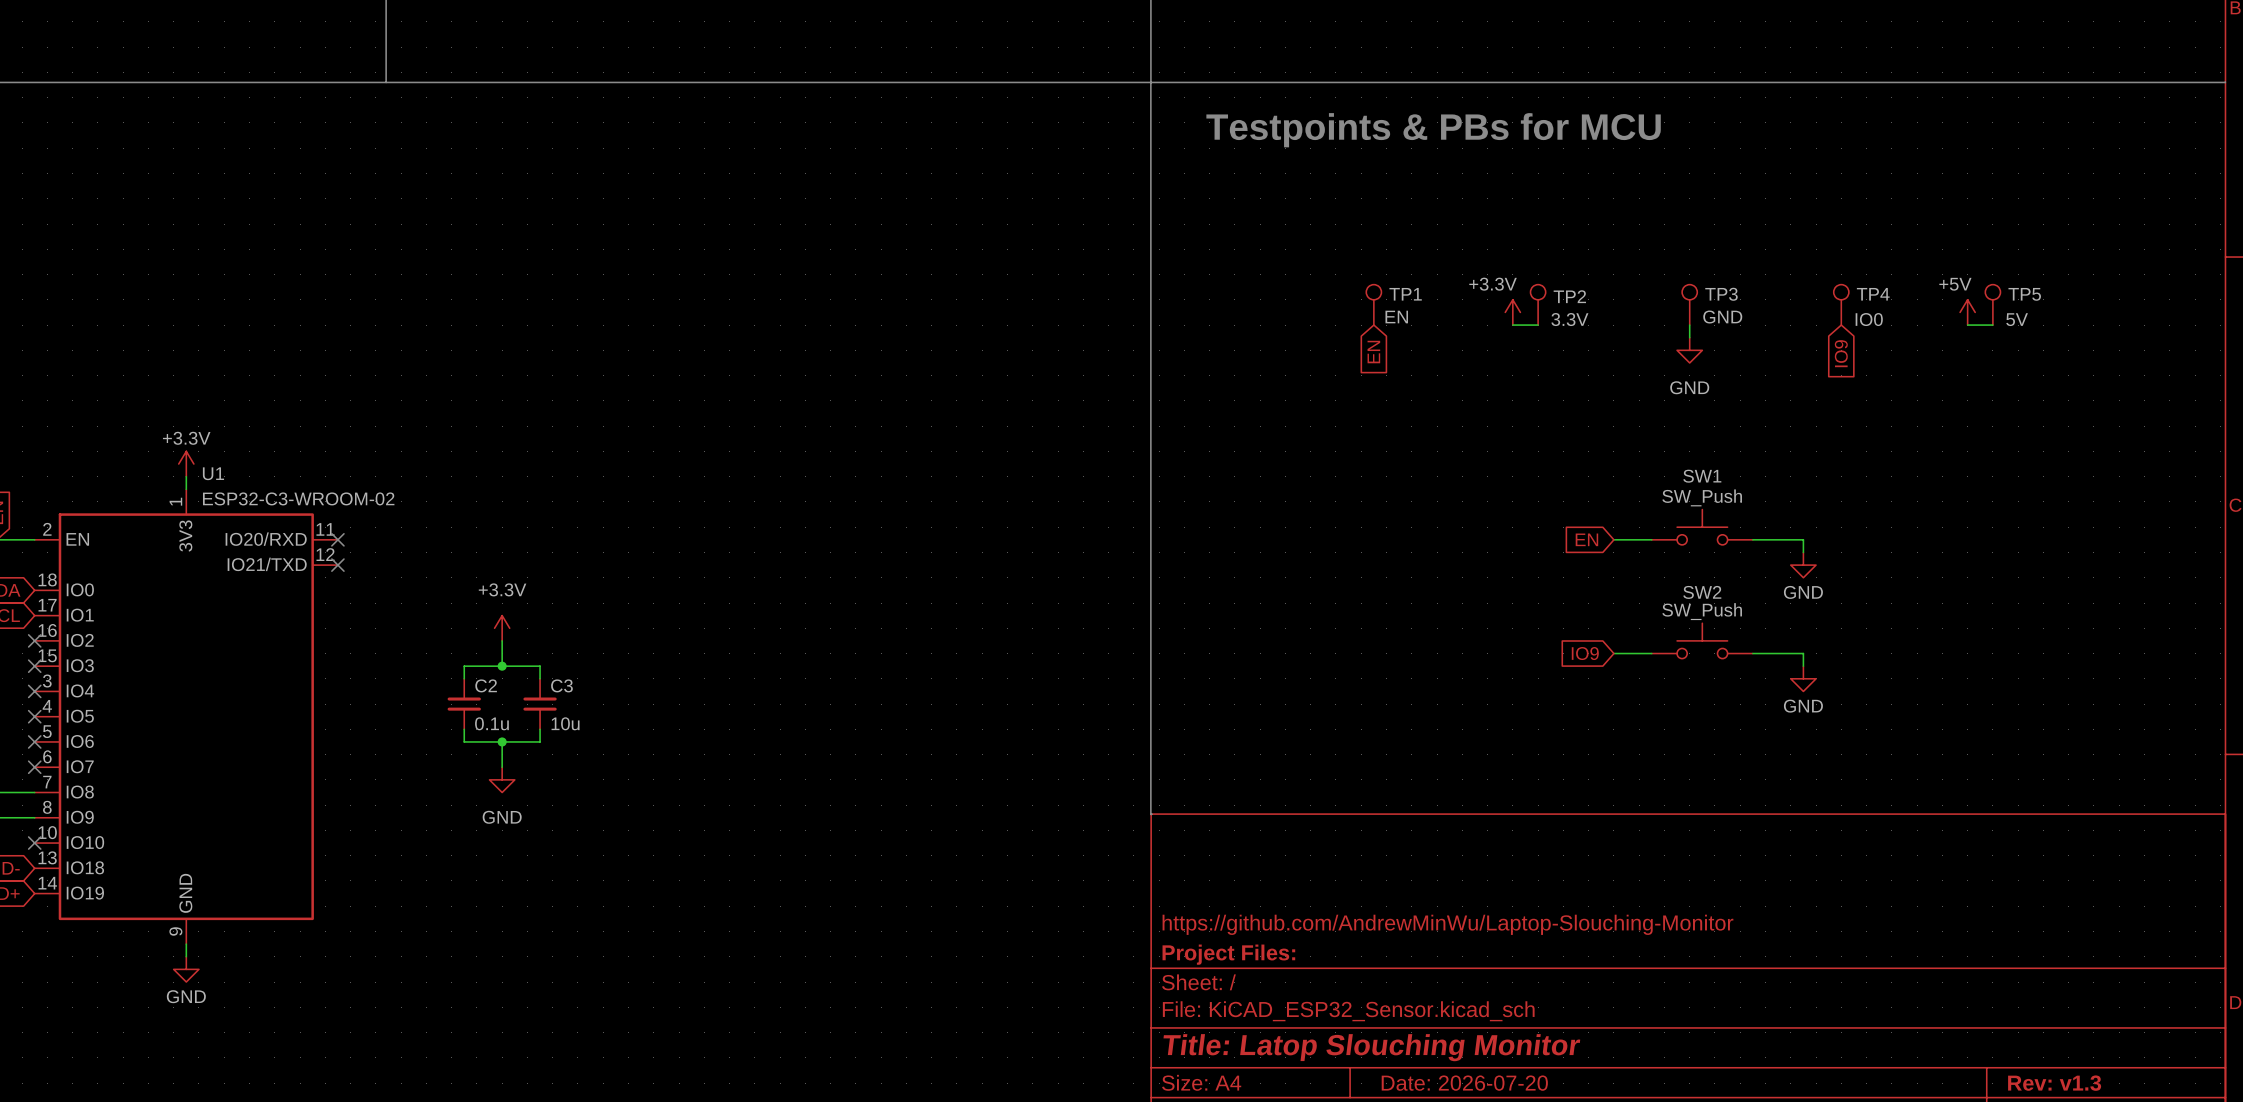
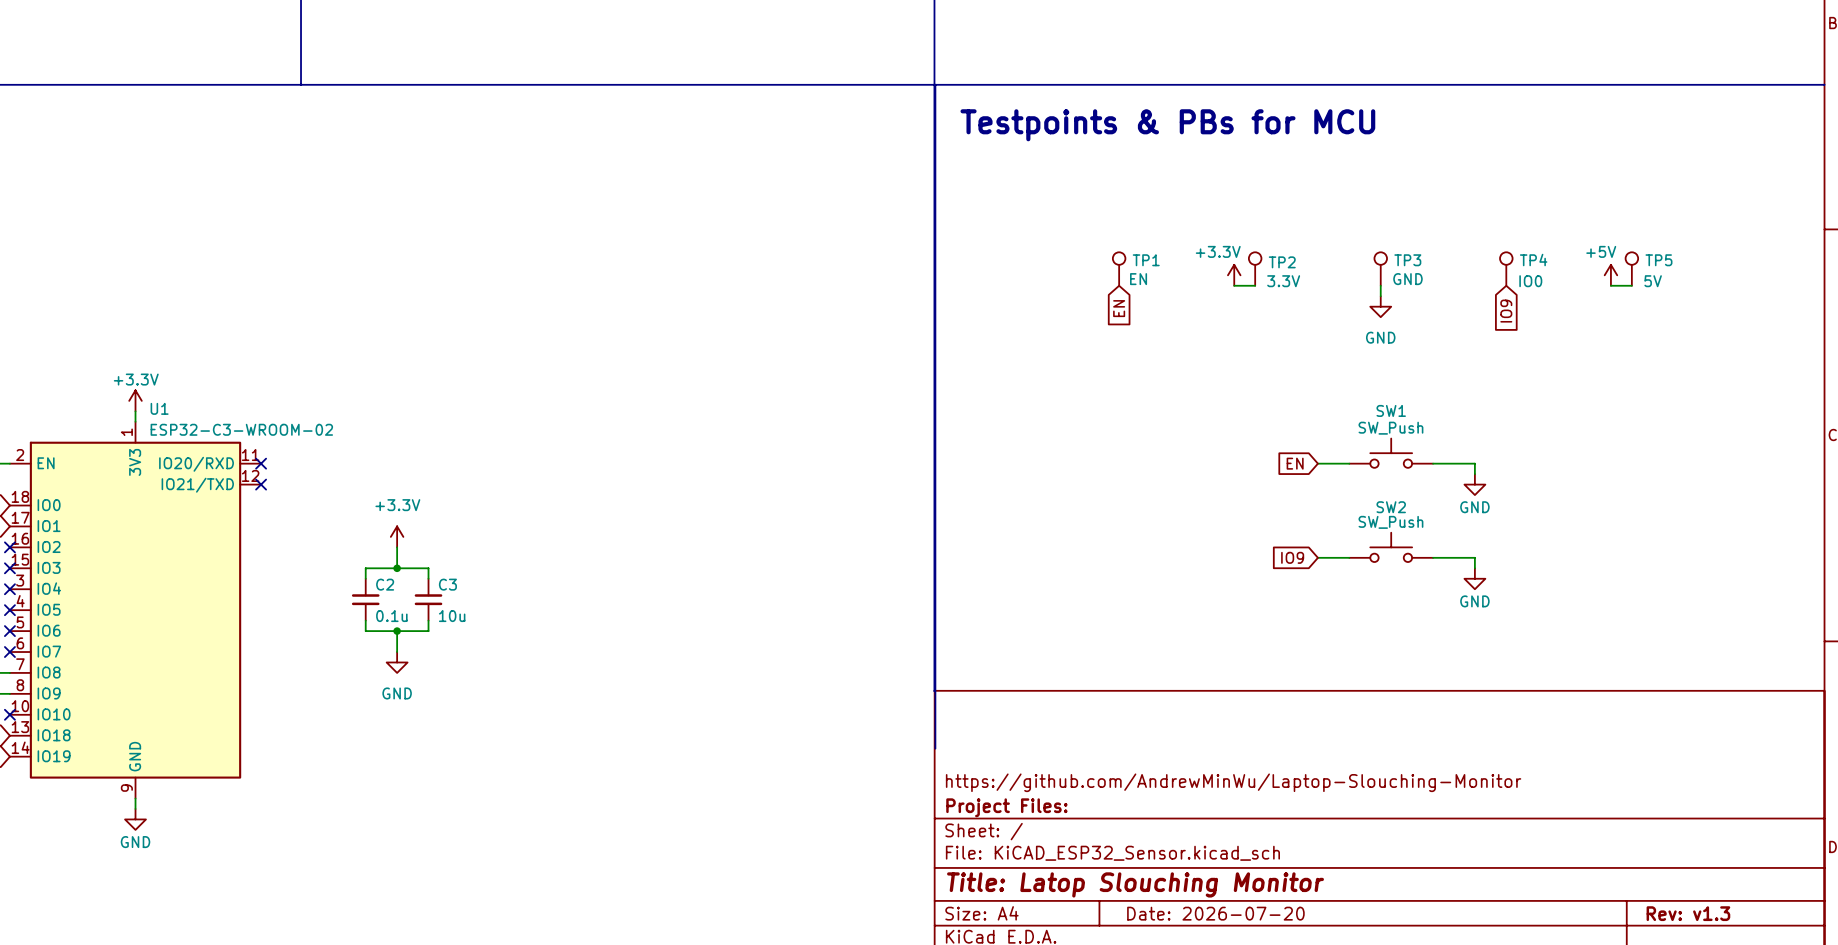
line: none -> (935, 84) (935, 748)

